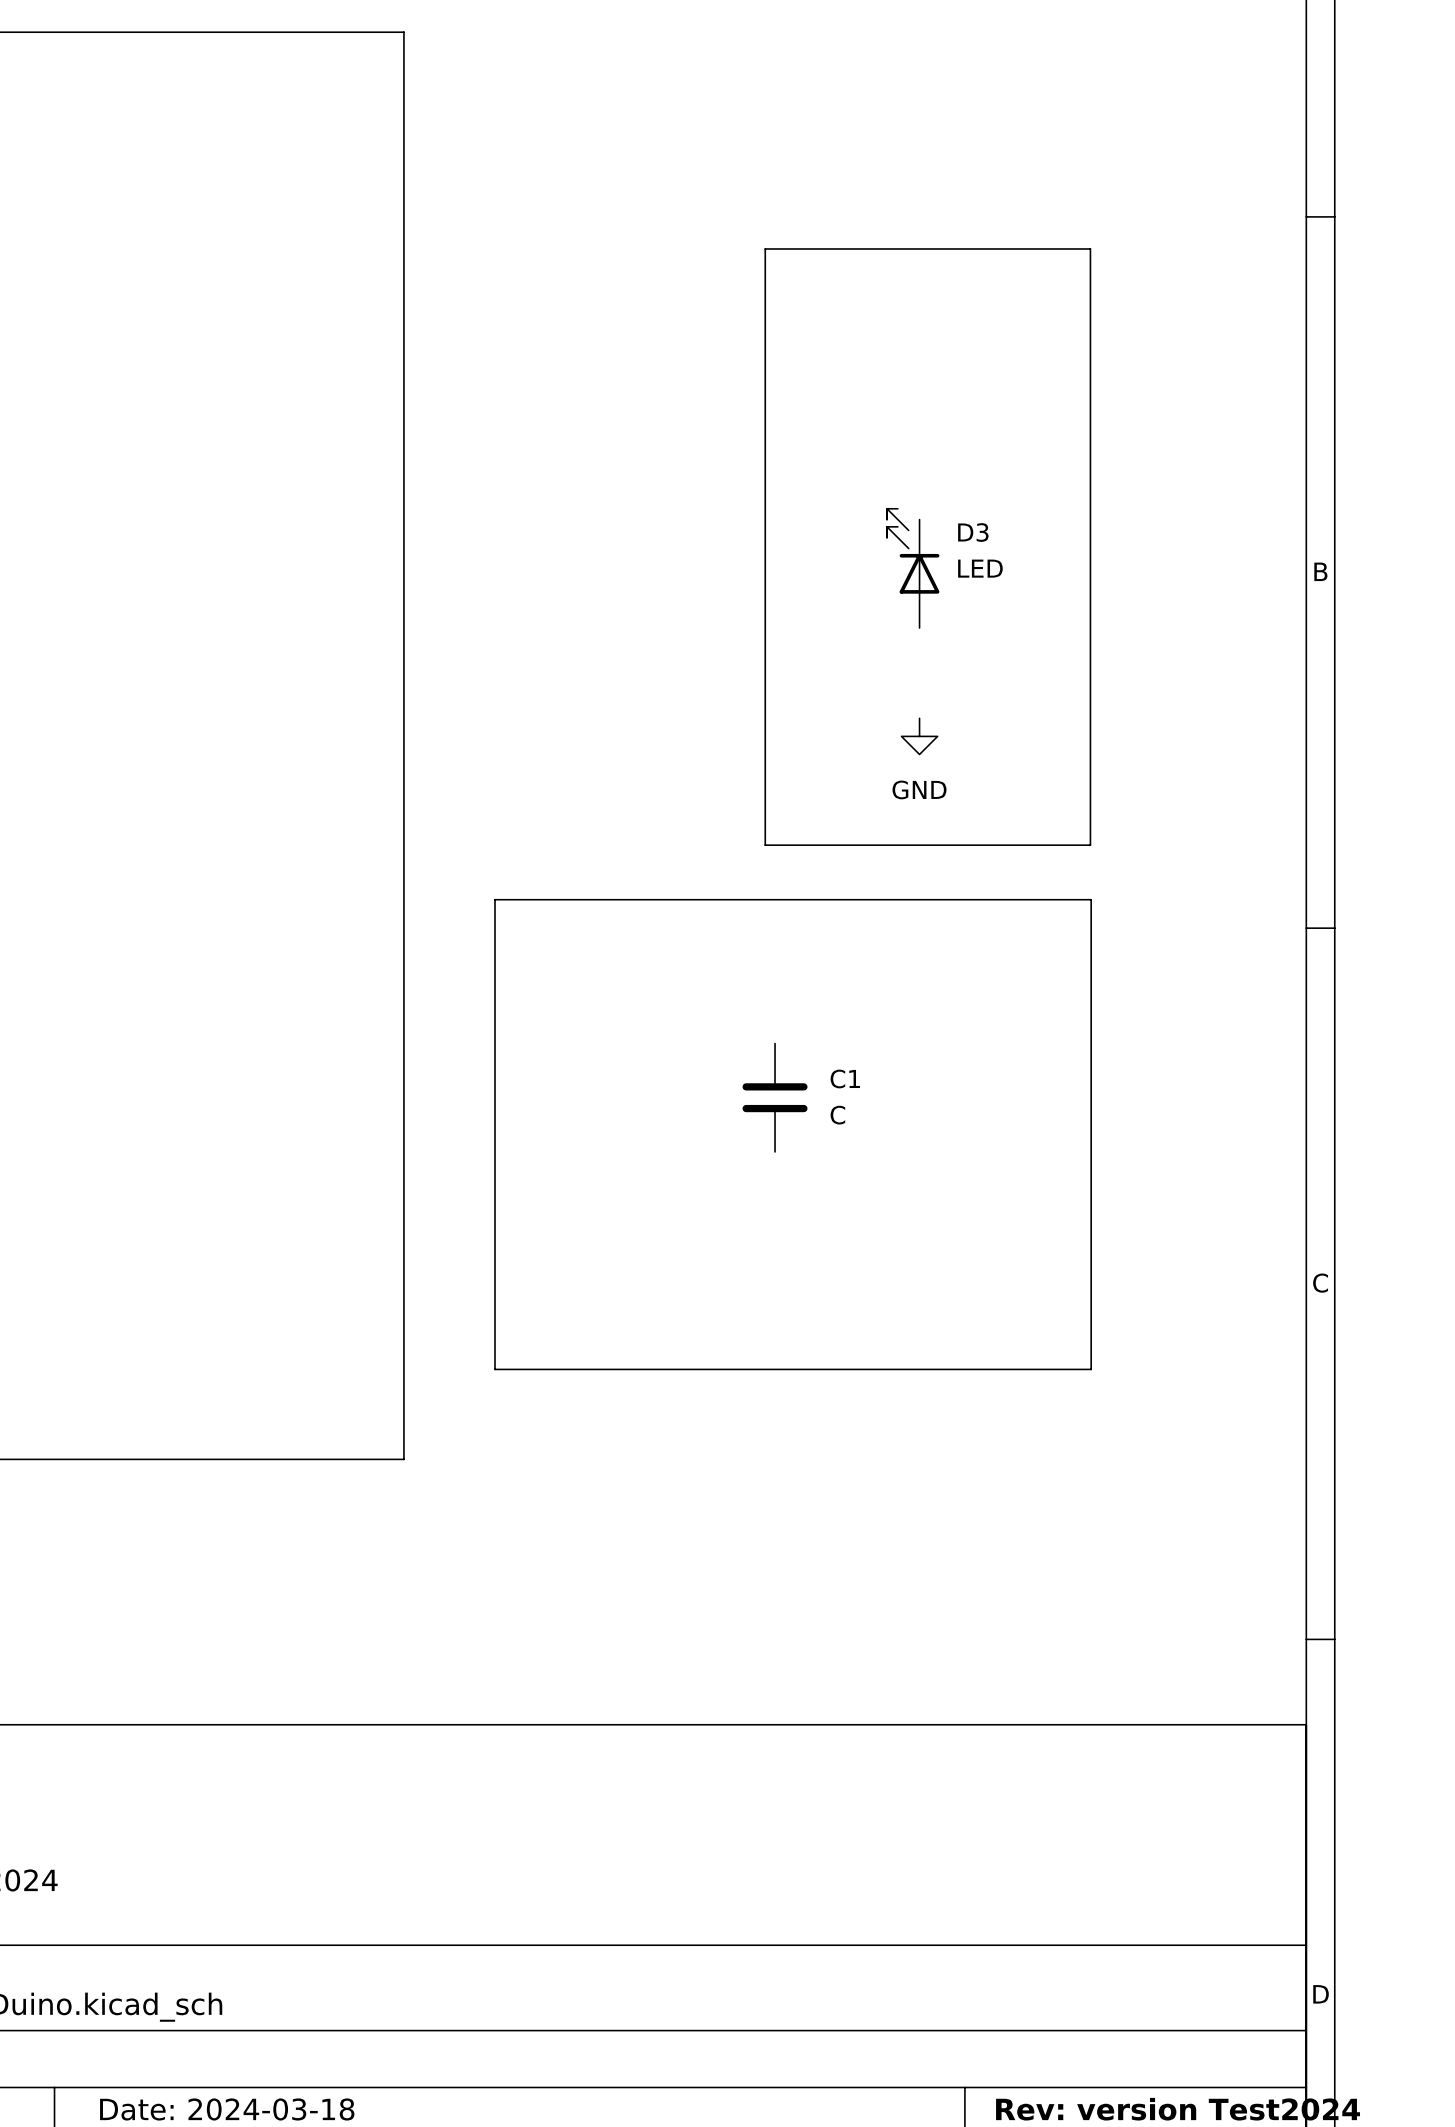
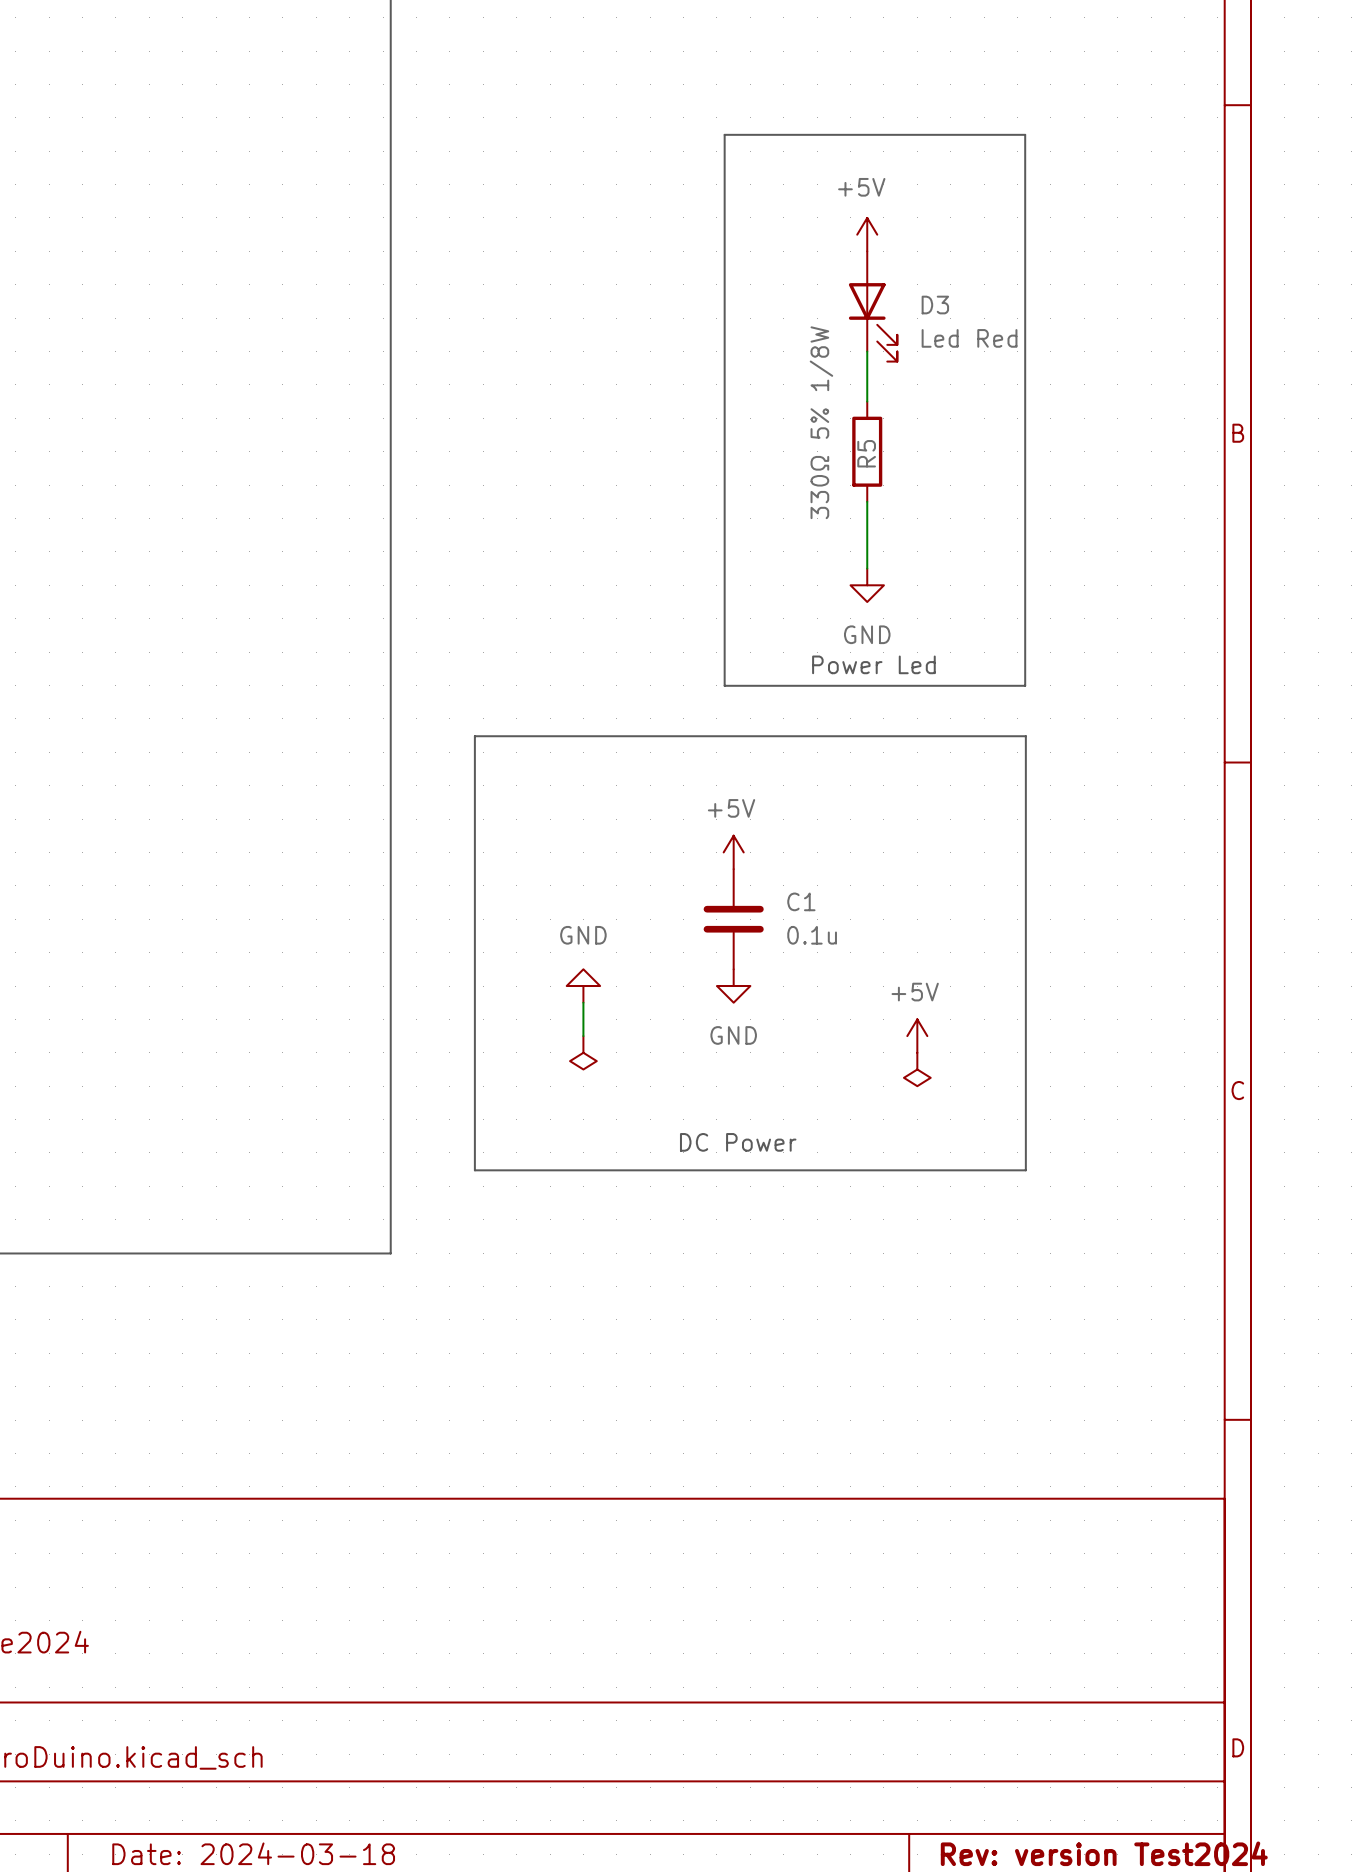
power symbol: none -> +5V (867, 234)
wire: none -> (867, 351) (867, 401)
D3 name position: D3 (973, 532) -> D3 (935, 305)
D3 rotation: 0° (913, 551) -> 180° (873, 322)
D3 position: (913, 568) -> (873, 306)
D3 value: LED (980, 568) -> Led Red (969, 338)
R5: none -> 330Ω 5% 1/8W (867, 451)
wire: none -> (867, 501) (867, 568)
text: none -> Power Led (873, 664)
power symbol: none -> +5V (733, 852)
C1 value: C (837, 1115) -> 0.1u (812, 935)
power symbol: none -> GND (583, 986)
power symbol: none -> GND (733, 986)
wire: none -> (583, 1002) (583, 1036)
power symbol: none -> +5V (917, 1036)
power symbol: none -> (583, 1052)
power symbol: none -> (917, 1069)
text: none -> DC Power (738, 1142)

